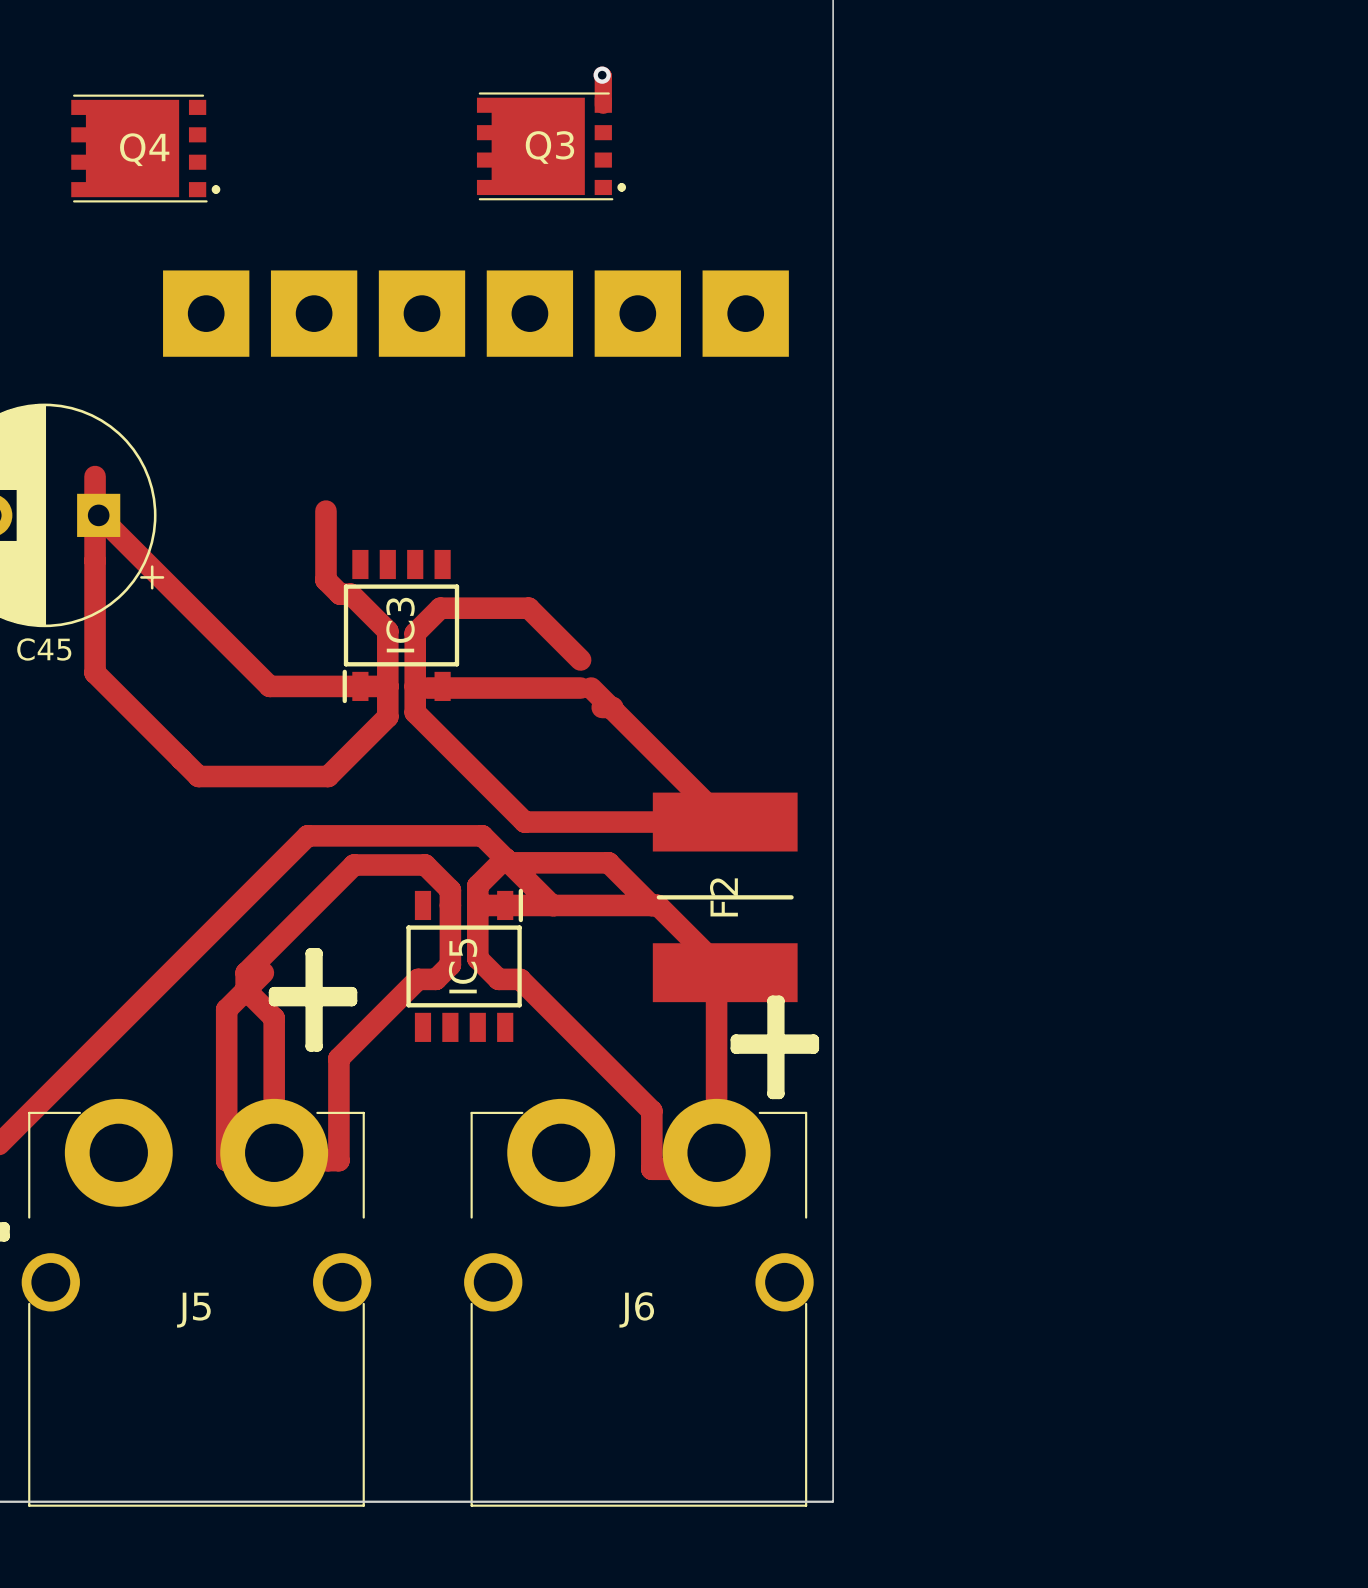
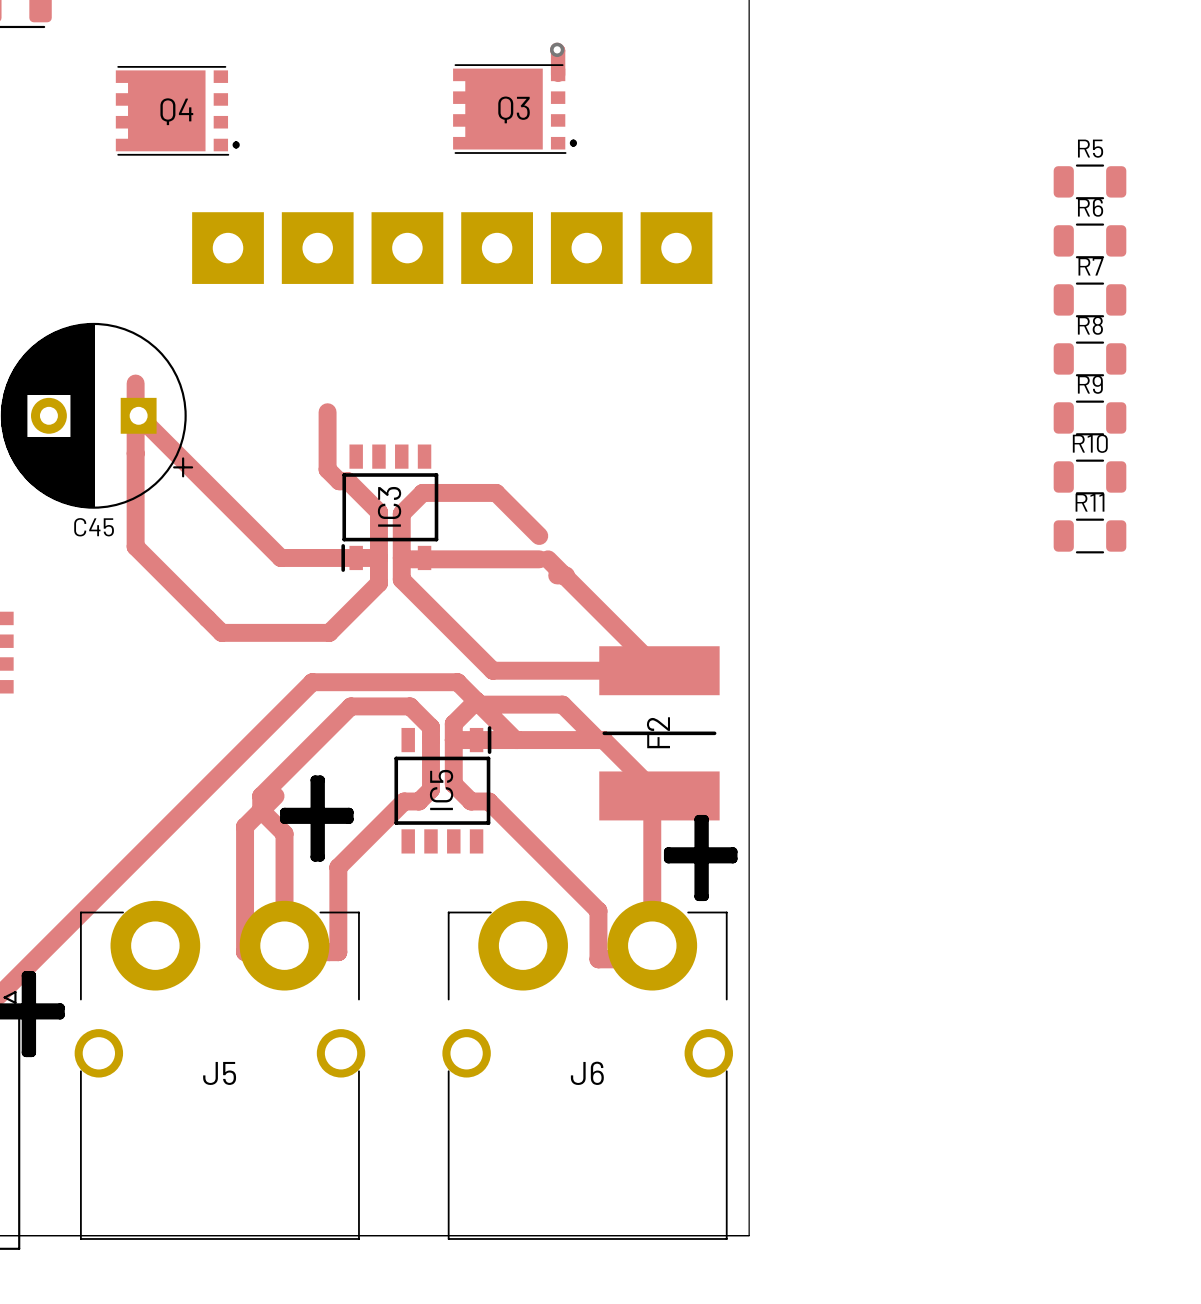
R5: none -> (1089, 181)
R6: none -> (1089, 240)
R7: none -> (1089, 299)
R8: none -> (1089, 358)
R9: none -> (1089, 417)
R10: none -> (1089, 476)
R11: none -> (1089, 536)

